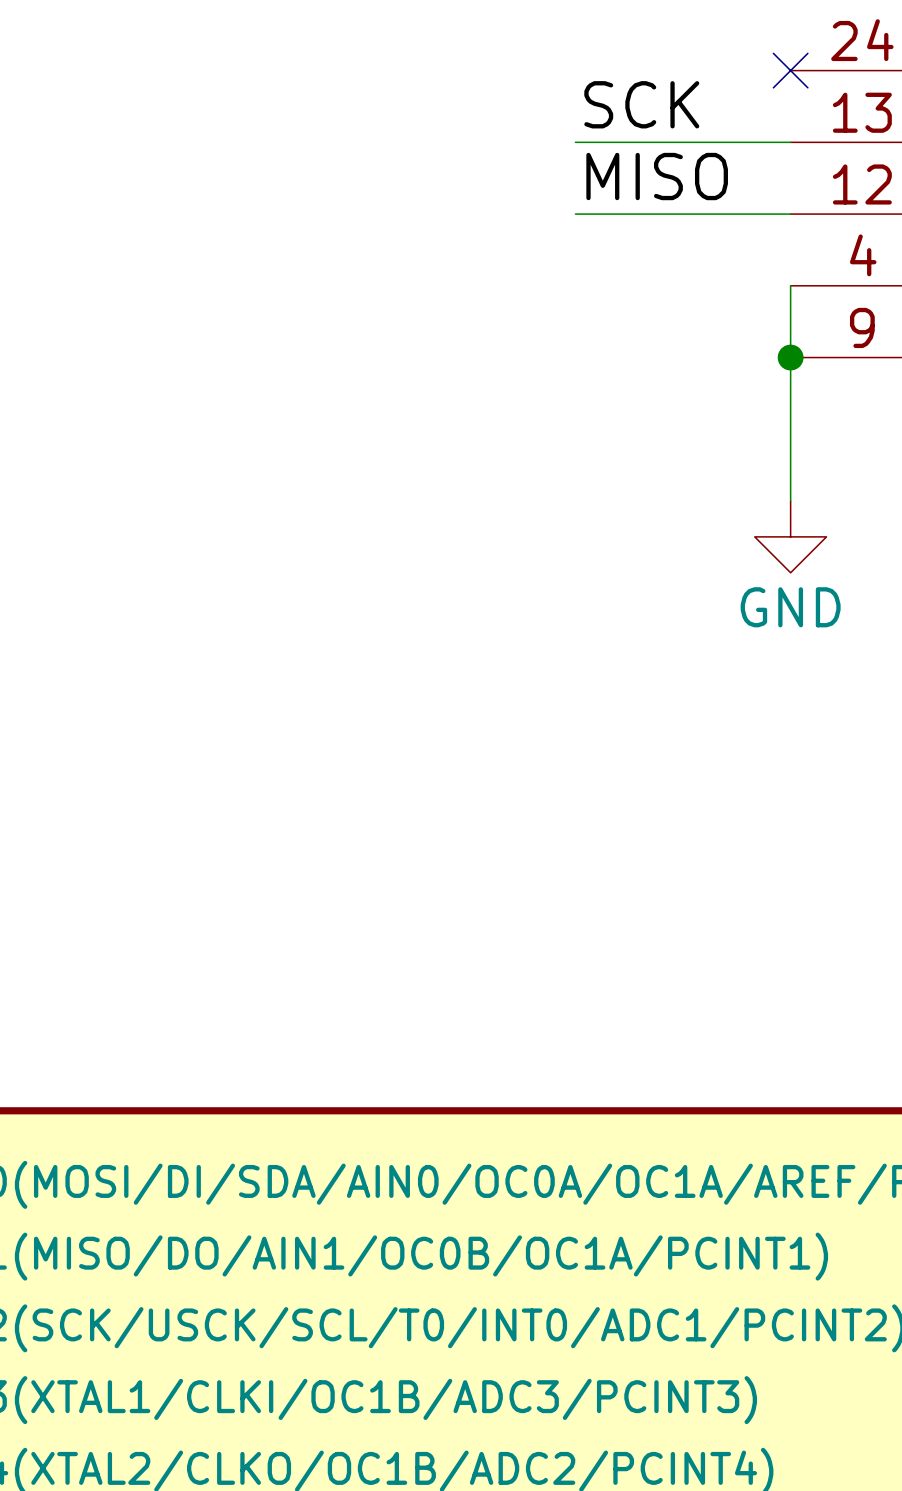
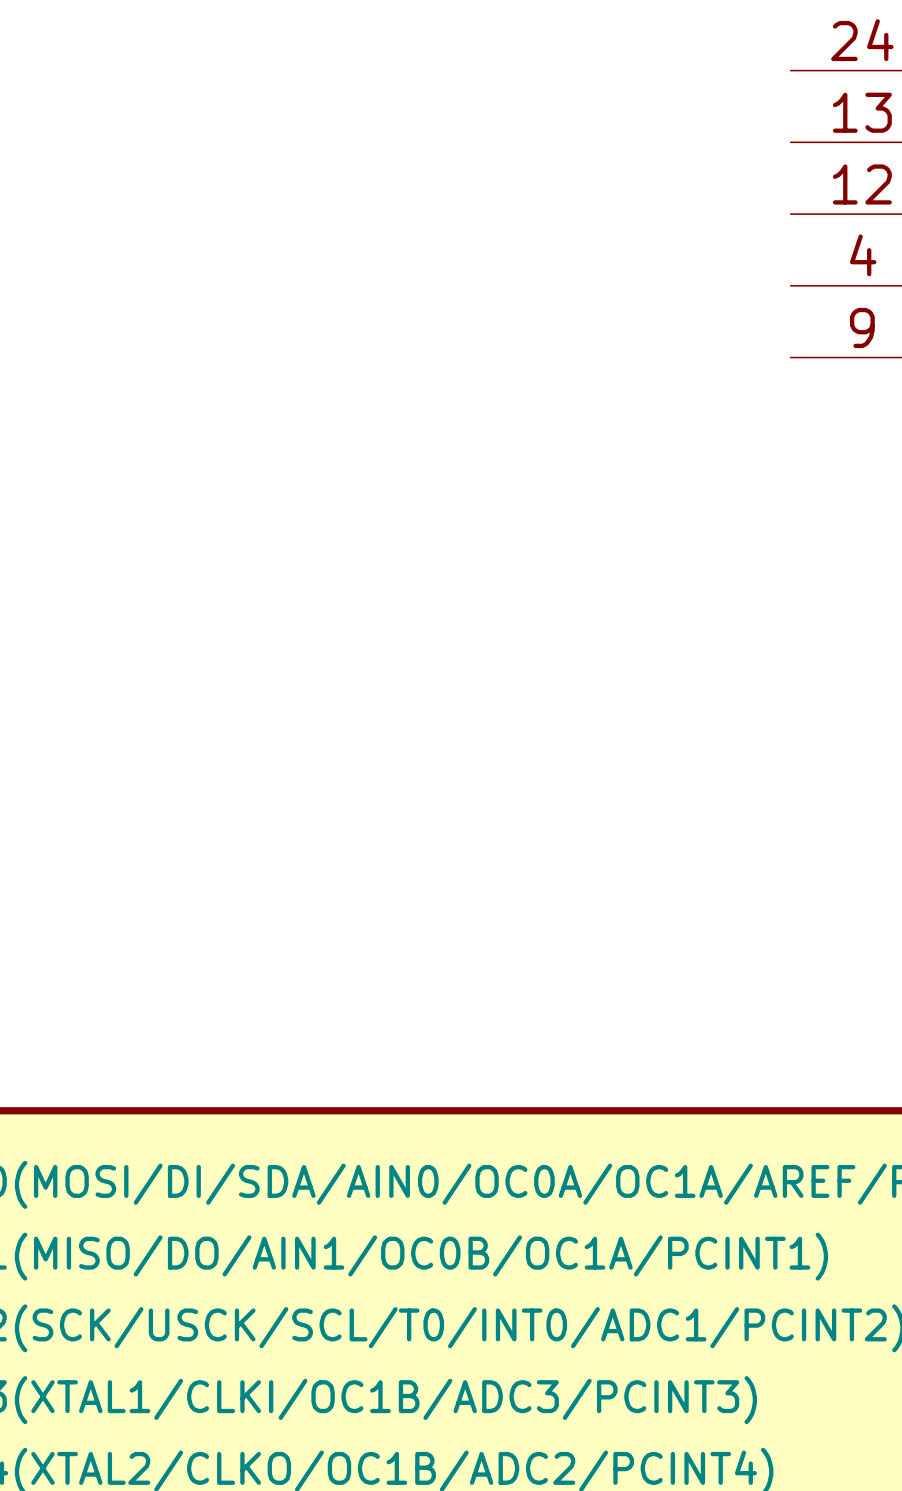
no-connect mark: (790, 70) -> none
label: SCK (641, 104) -> none
wire: (575, 142) (790, 142) -> none
label: MISO (657, 176) -> none
wire: (575, 214) (790, 214) -> none
wire: (790, 285) (790, 501) -> none
junction: (790, 357) -> none
power symbol: GND (790, 536) -> none

